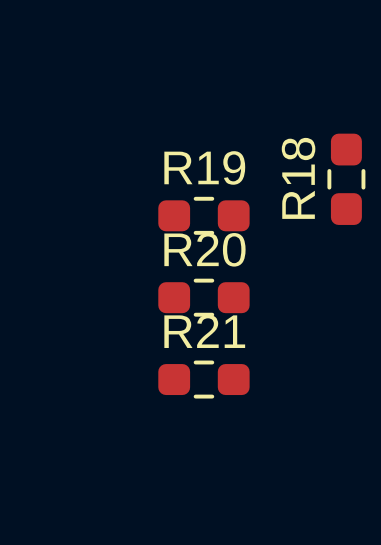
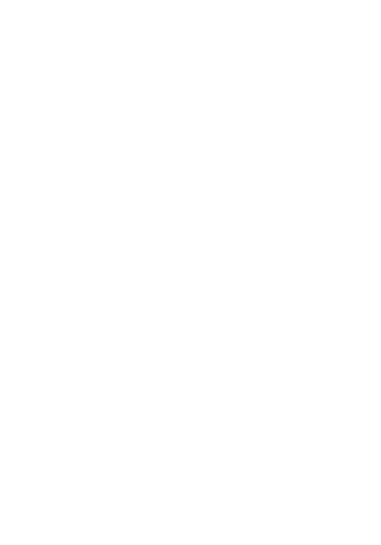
R18: (346, 179) -> none
R19: (203, 215) -> none
R20: (203, 297) -> none
R21: (203, 379) -> none

